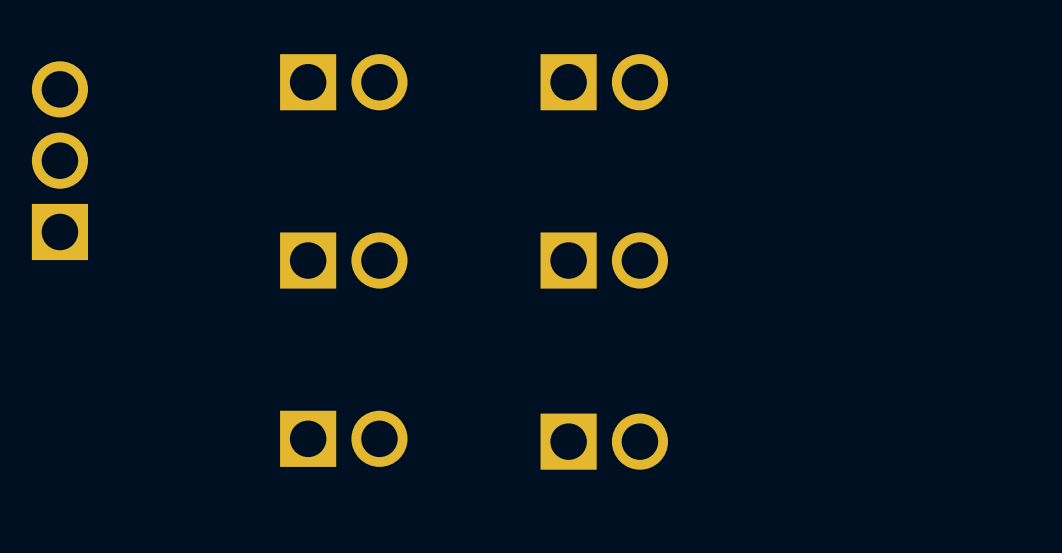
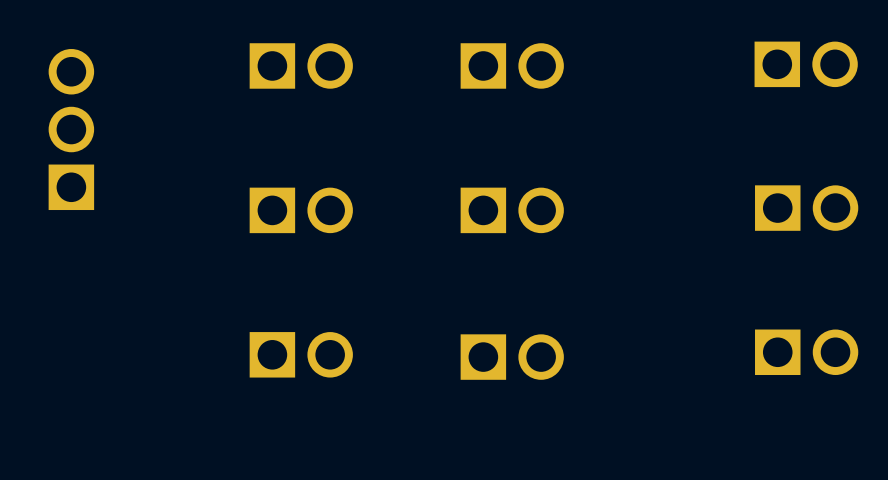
part: none -> (806, 64)
part: none -> (806, 208)
part: none -> (806, 352)

